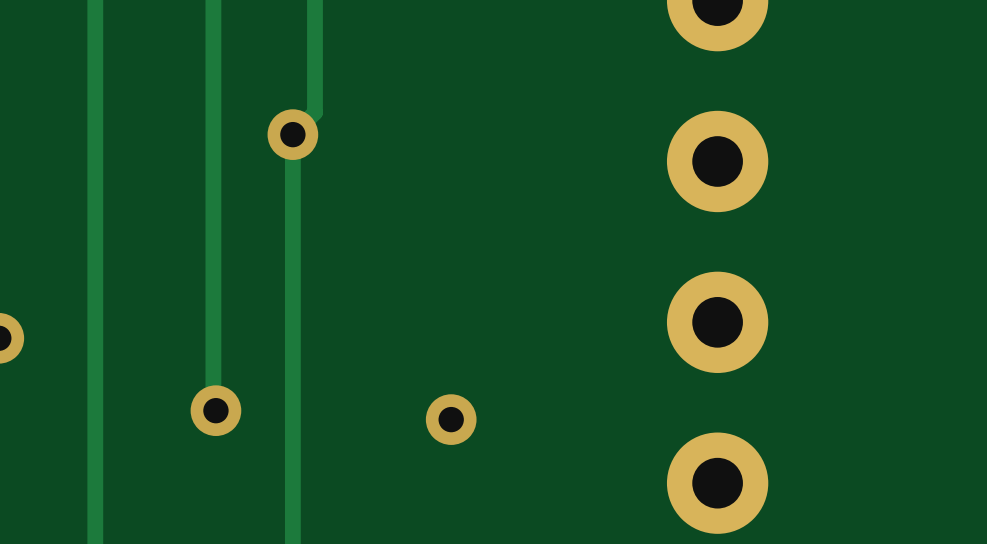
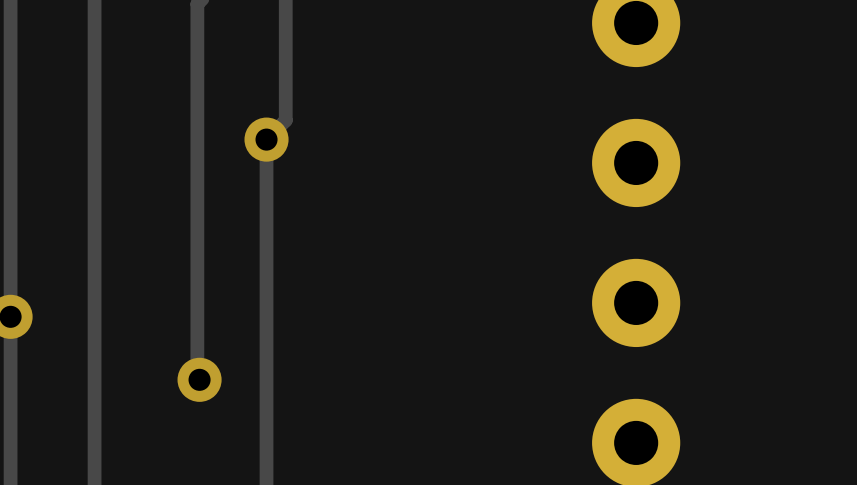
via: (451, 419) -> none

